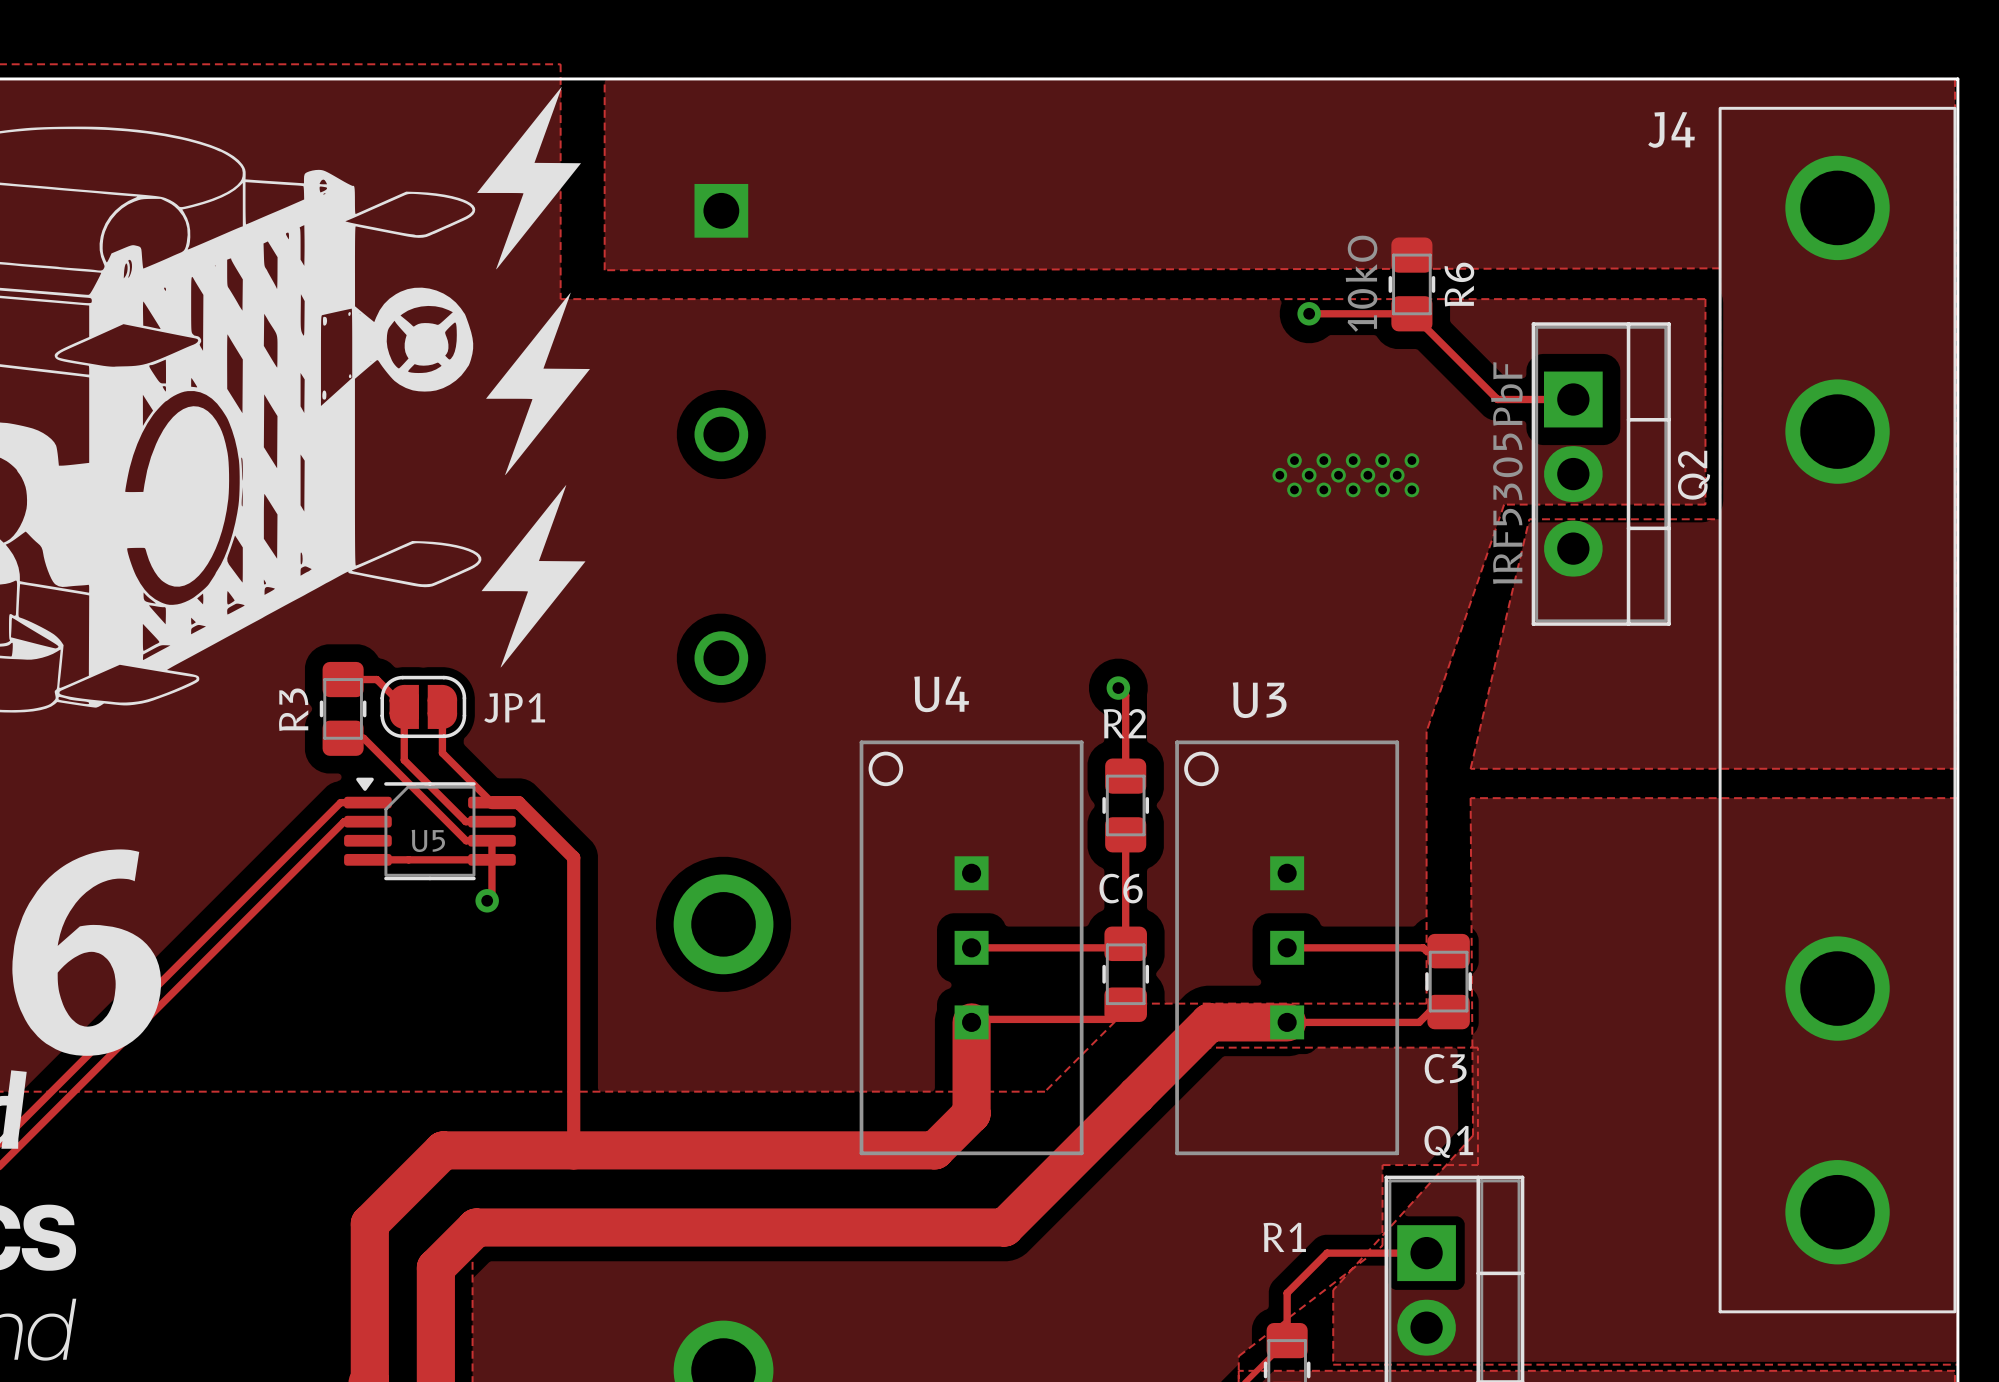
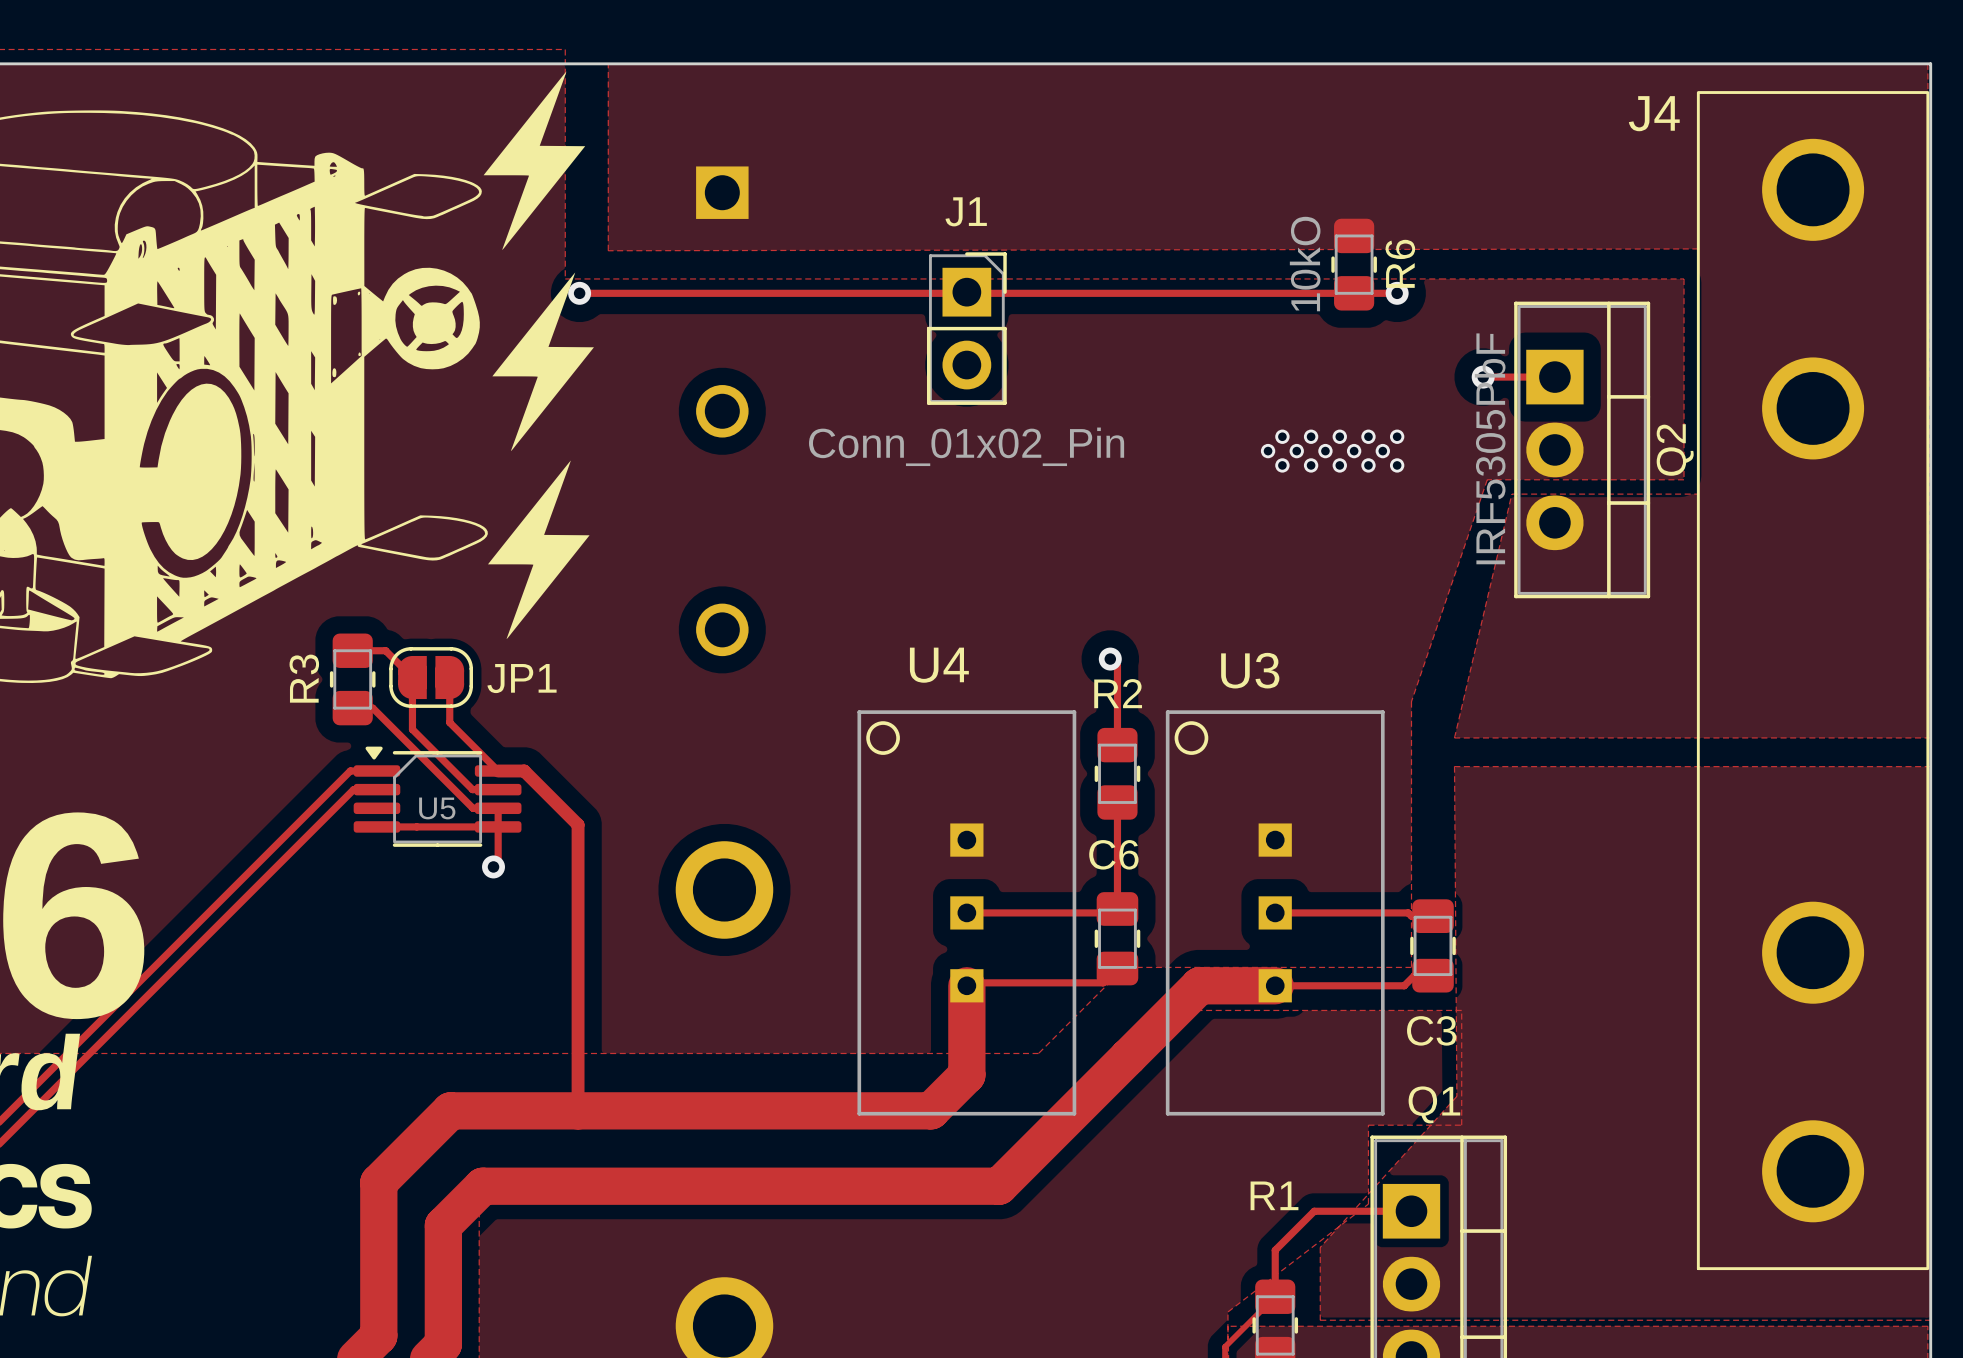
R6 position: (1411, 284) -> (1354, 264)
track: none -> (579, 293) (1296, 293)
via: none -> (579, 293)
via position: (1309, 313) -> (1397, 293)
track: (1411, 313) (1497, 399) -> none
J1: none -> Conn_01x02_Pin (966, 328)
via: none -> (1483, 377)

